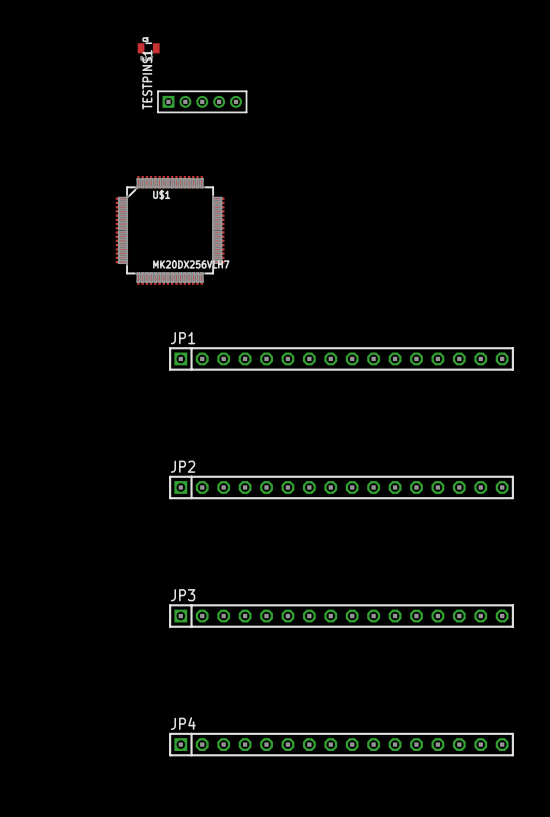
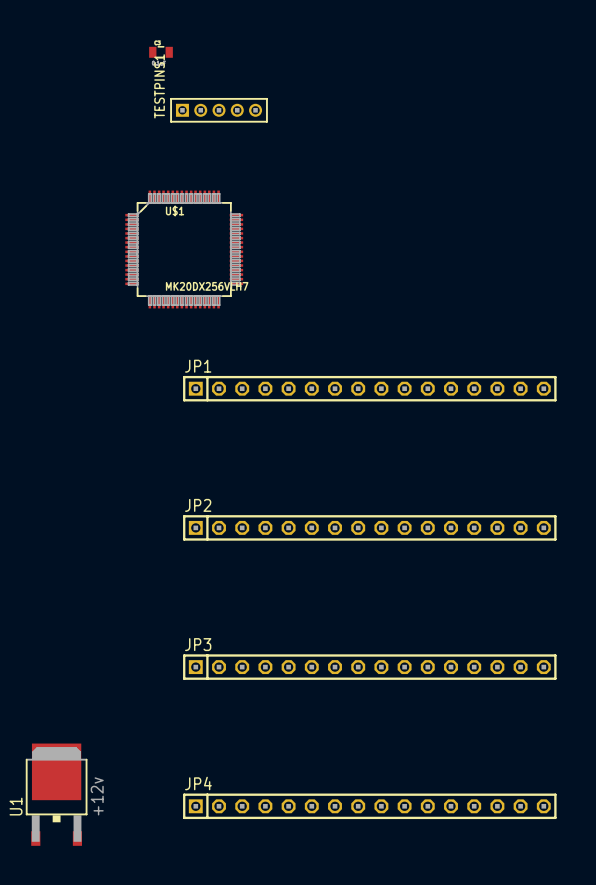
U1: none -> +12v (56, 794)

